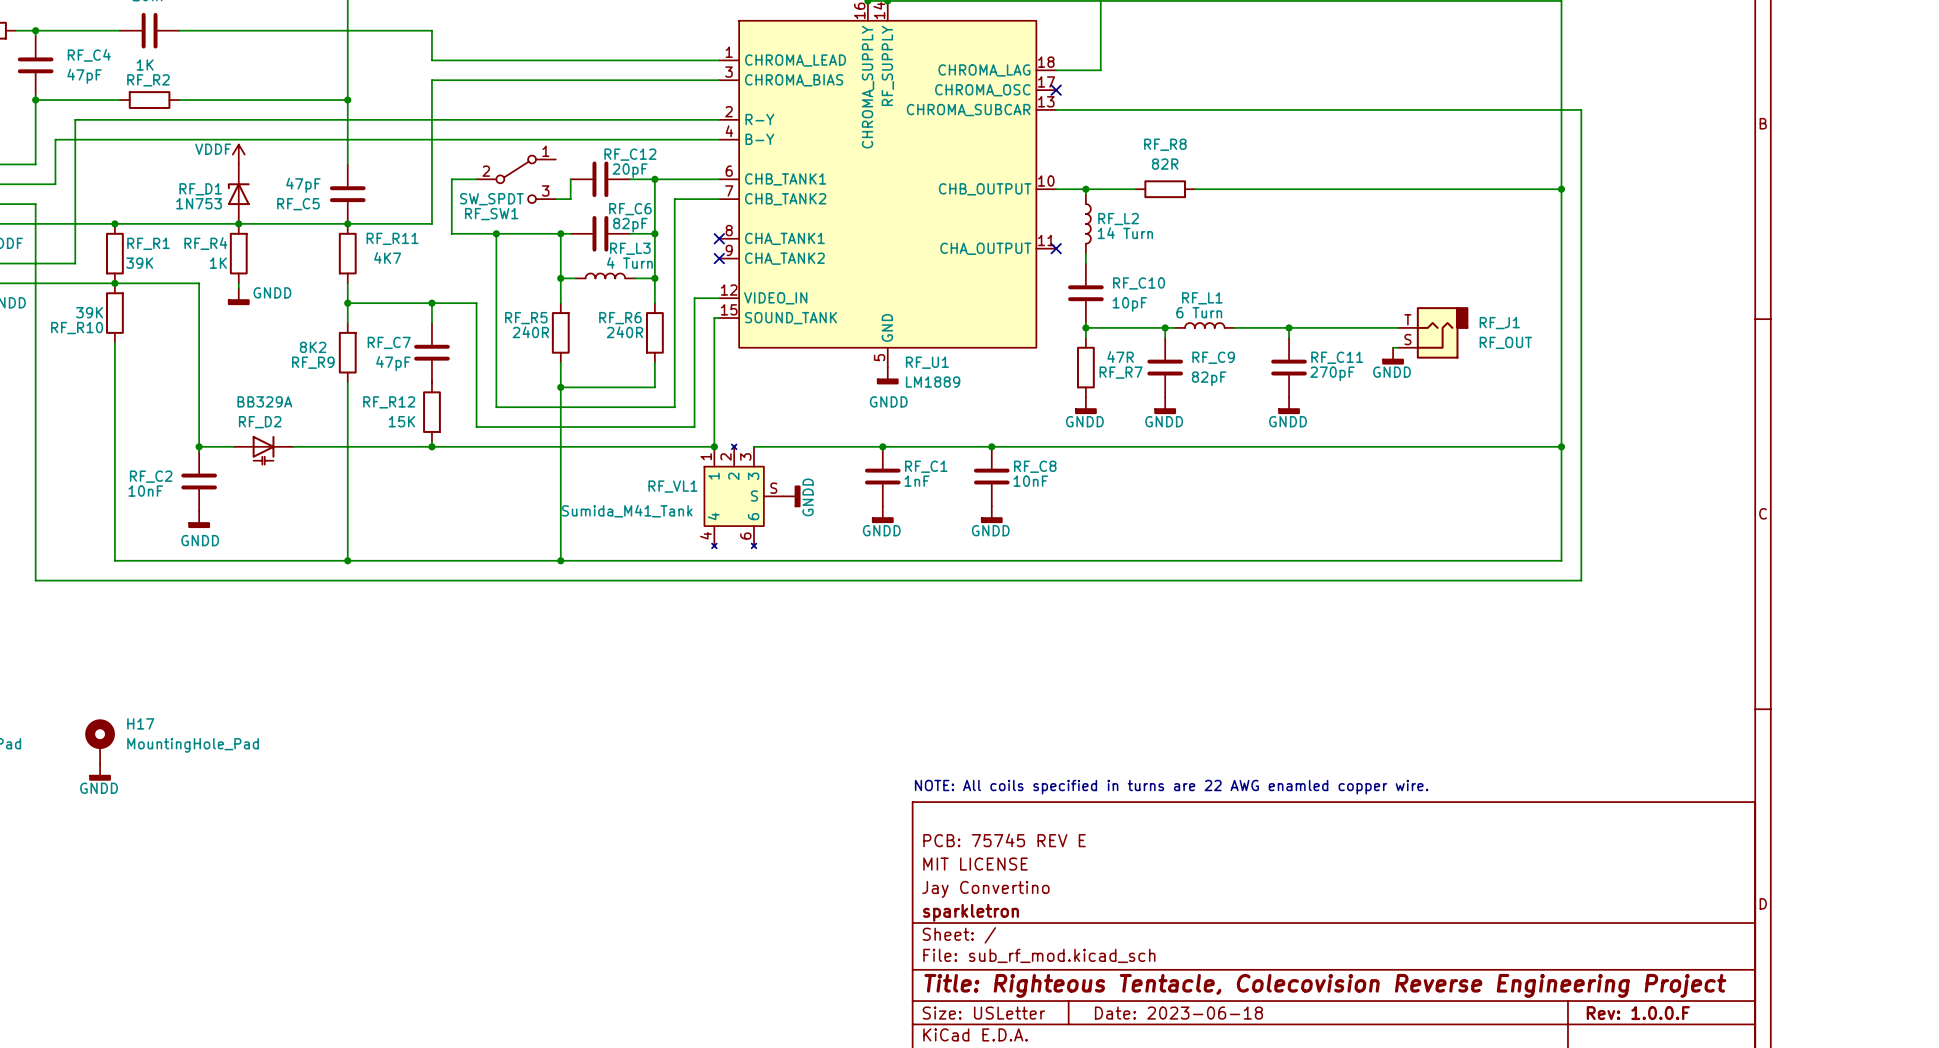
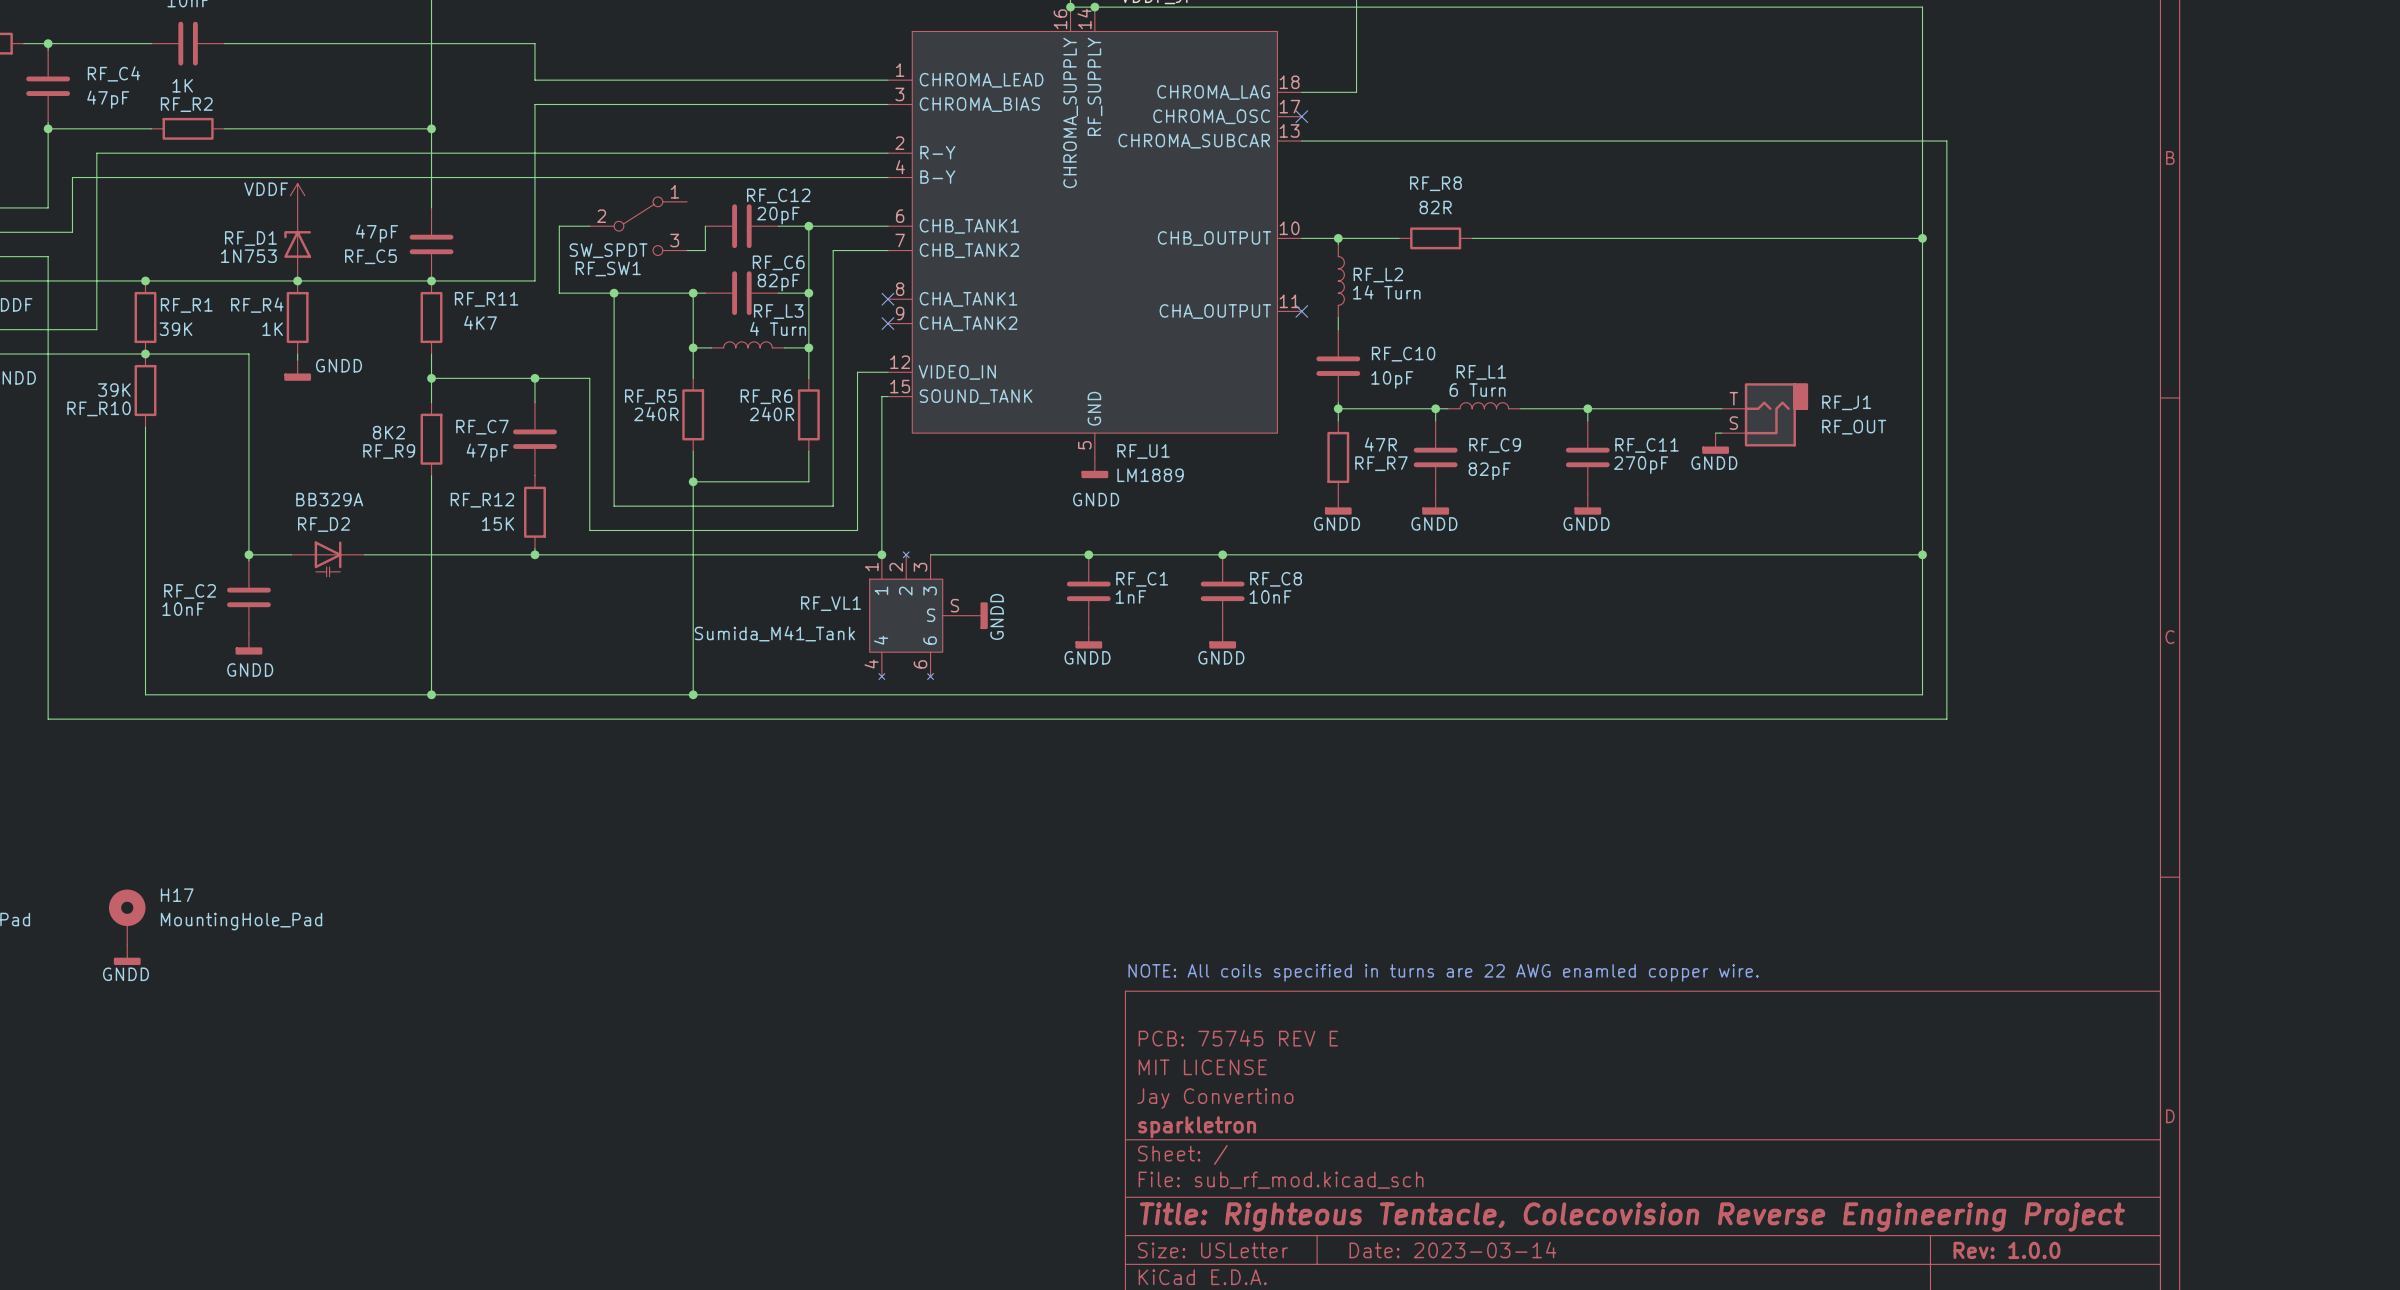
title block: Date: 2023-06-18 (1178, 1013) -> Date: 2023-03-14 (1452, 1250)
title block: Rev: 1.0.0.F (1638, 1013) -> Rev: 1.0.0 (2006, 1250)

